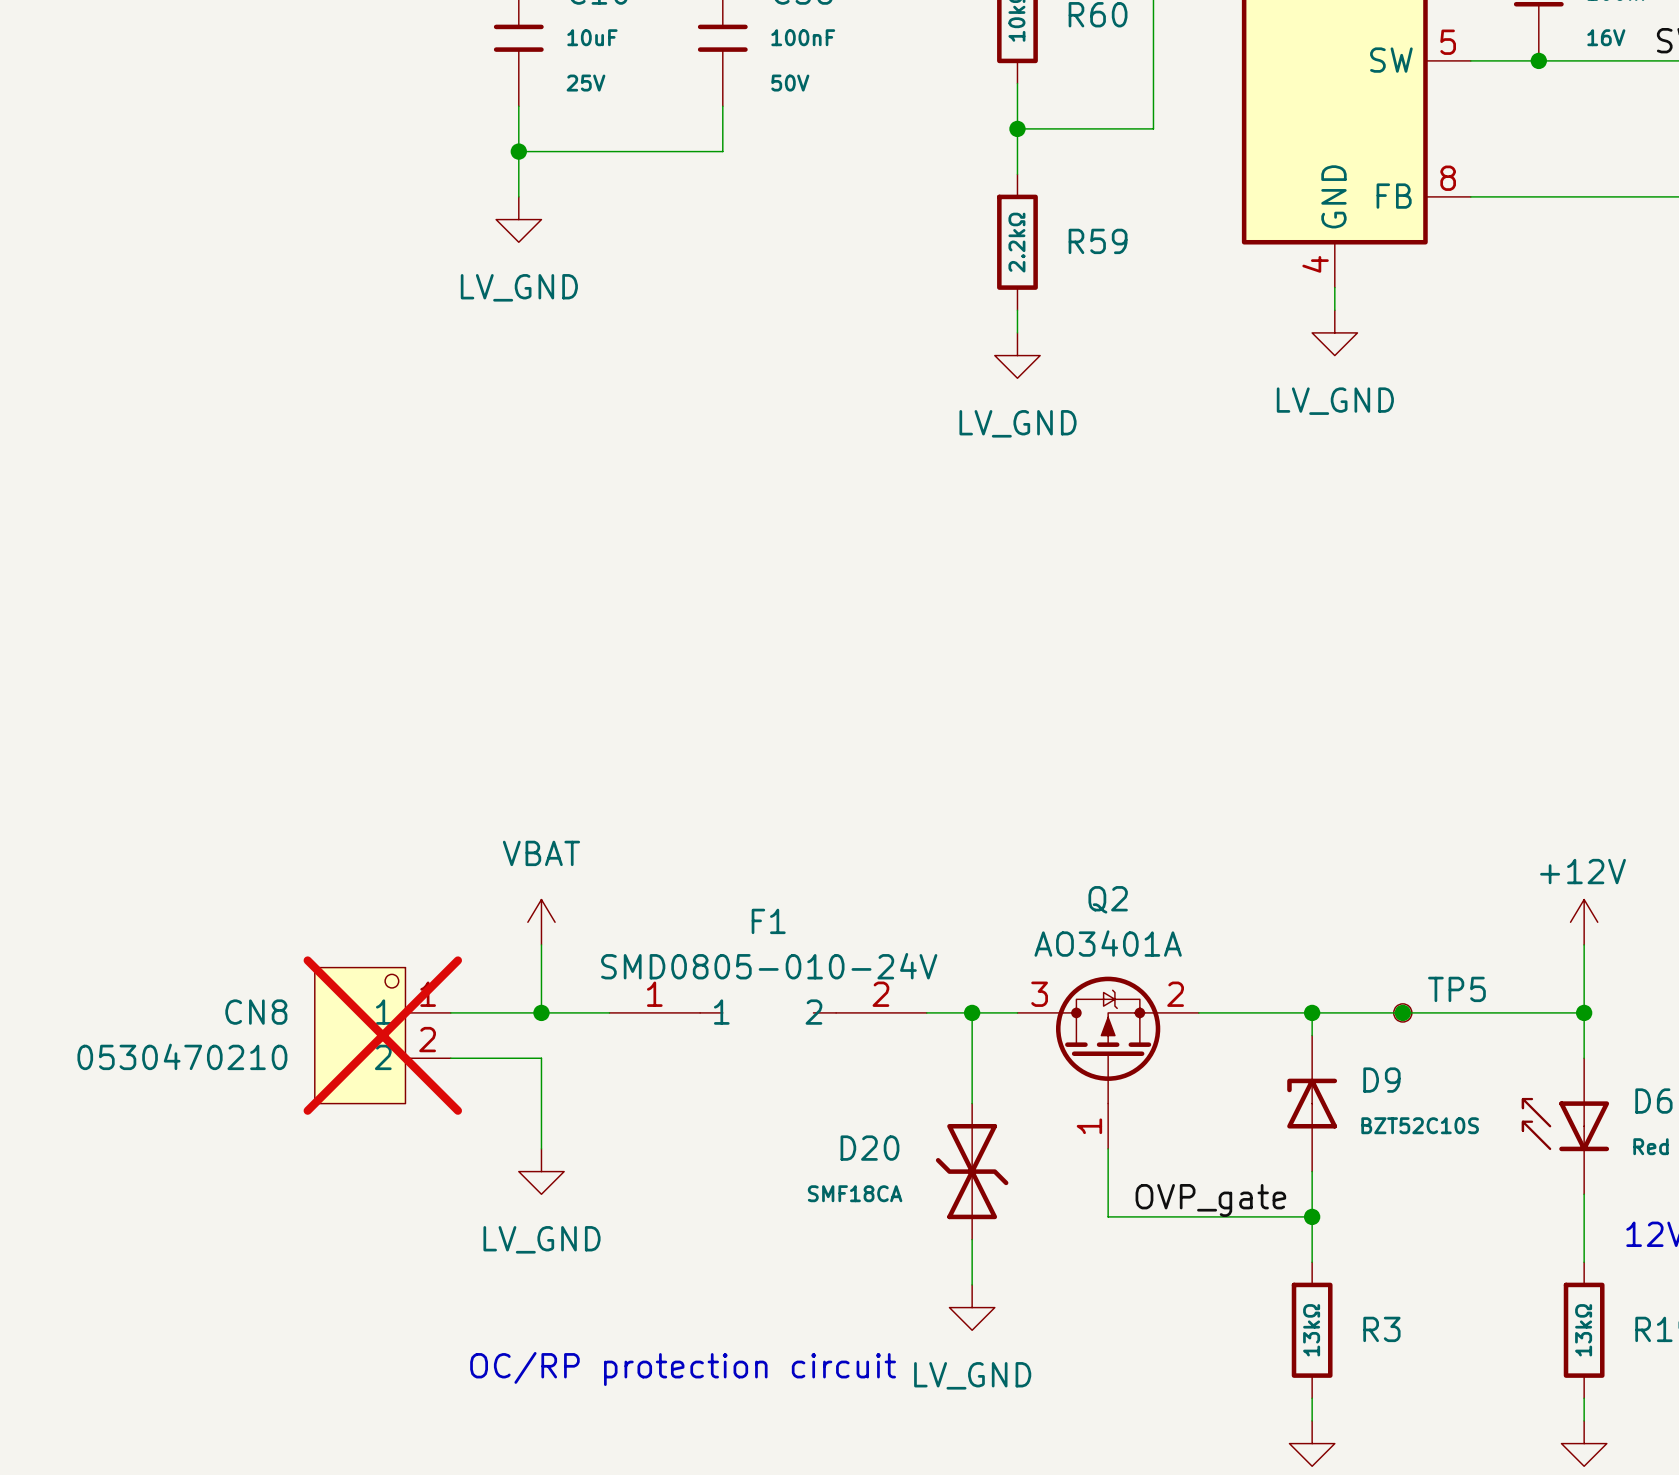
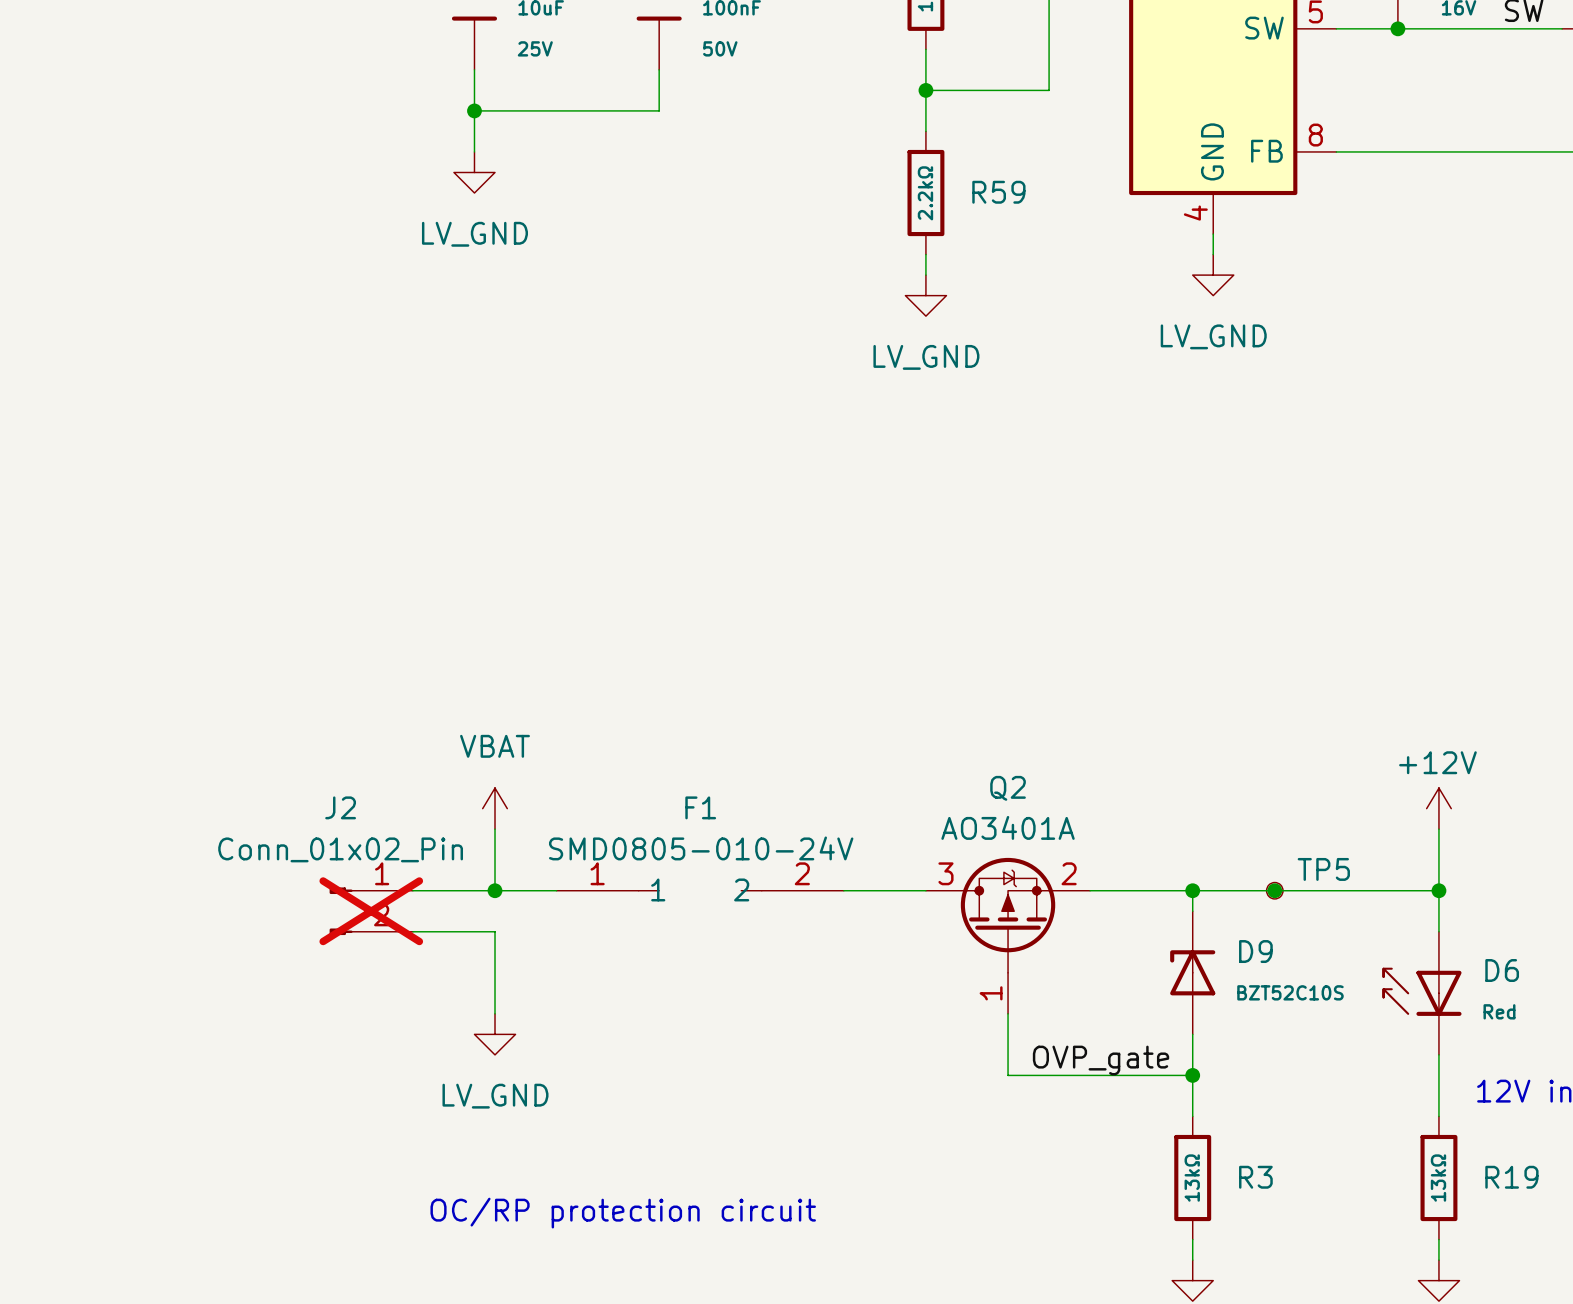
wire: (972, 1012) (972, 1103) -> none
junction: (972, 1012) -> none
CN8: 0530470210 (382, 1035) -> none
J2: none -> Conn_01x02_Pin (371, 911)
D20: SMF18CA (972, 1171) -> none
wire: (972, 1239) (972, 1284) -> none
power symbol: LV_GND (972, 1307) -> none

